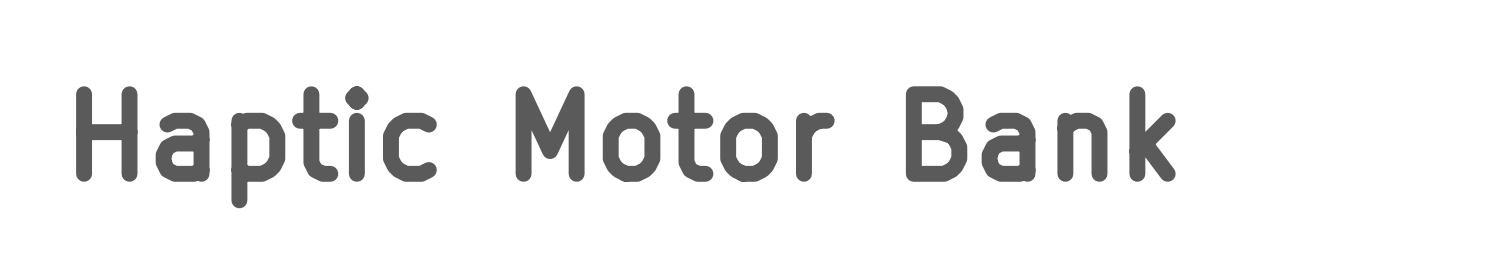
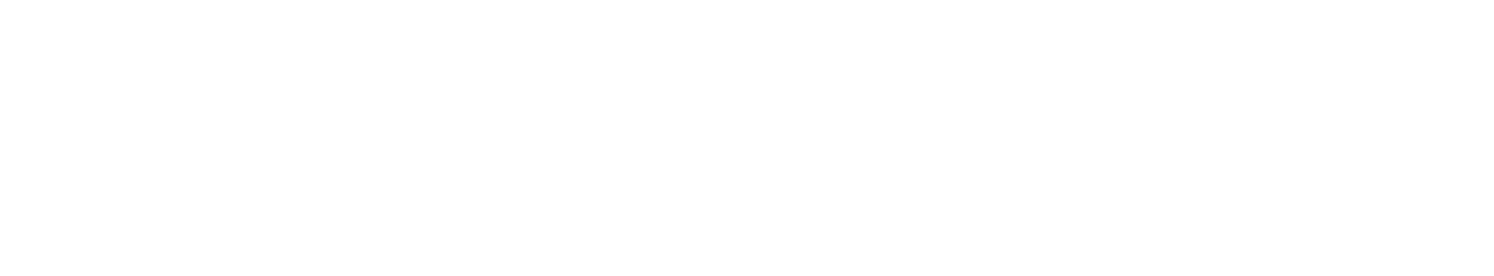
text: Haptic Motor Bank (625, 147) -> none

